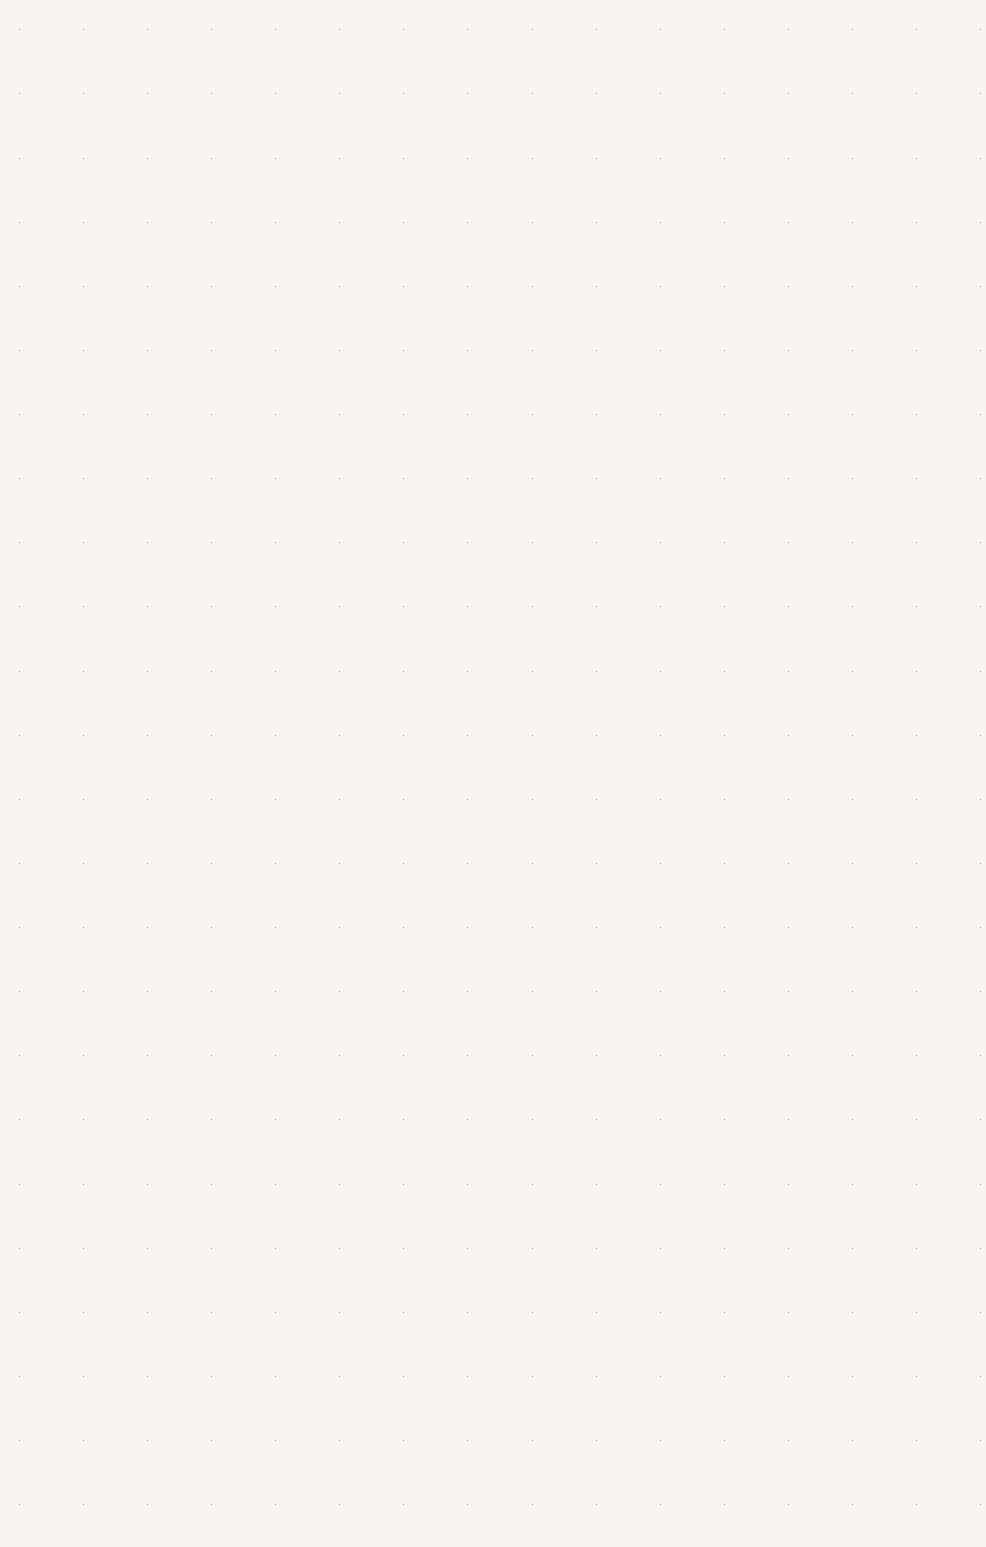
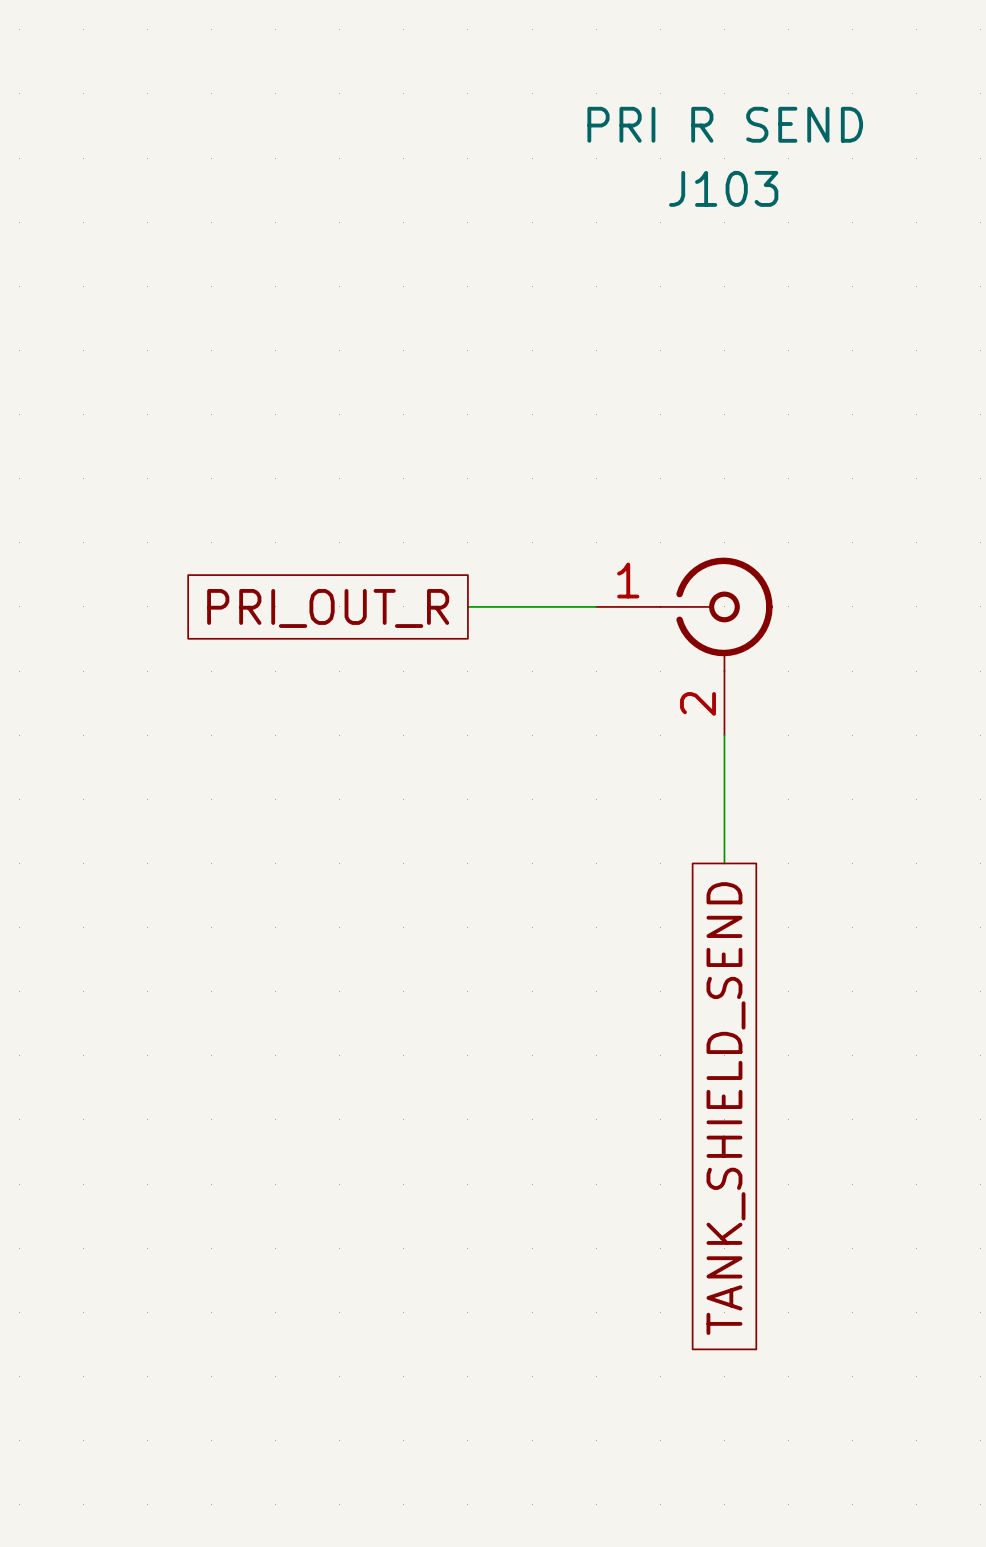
wire: none -> (467, 606) (596, 606)
global label: none -> PRI_OUT_R (328, 608)
J103: none -> PRI R SEND (684, 646)
wire: none -> (724, 735) (724, 863)
global label: none -> TANK_SHIELD_SEND (725, 1108)

